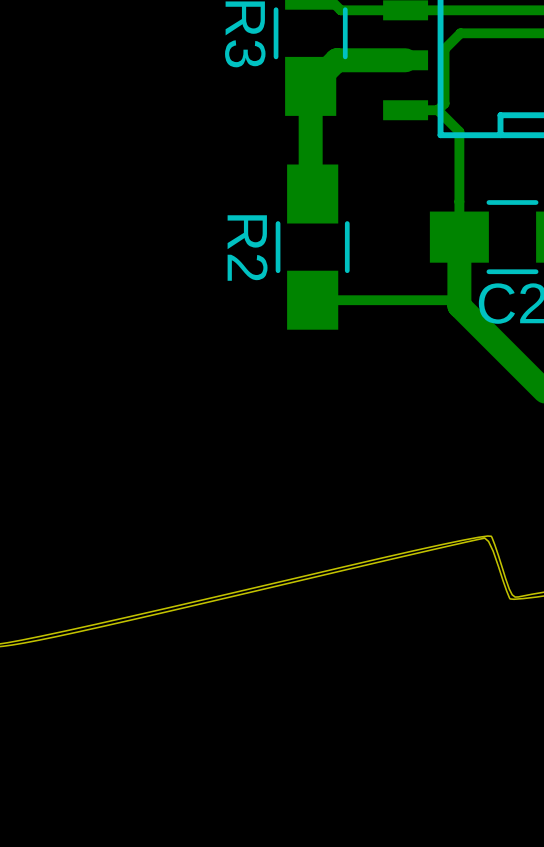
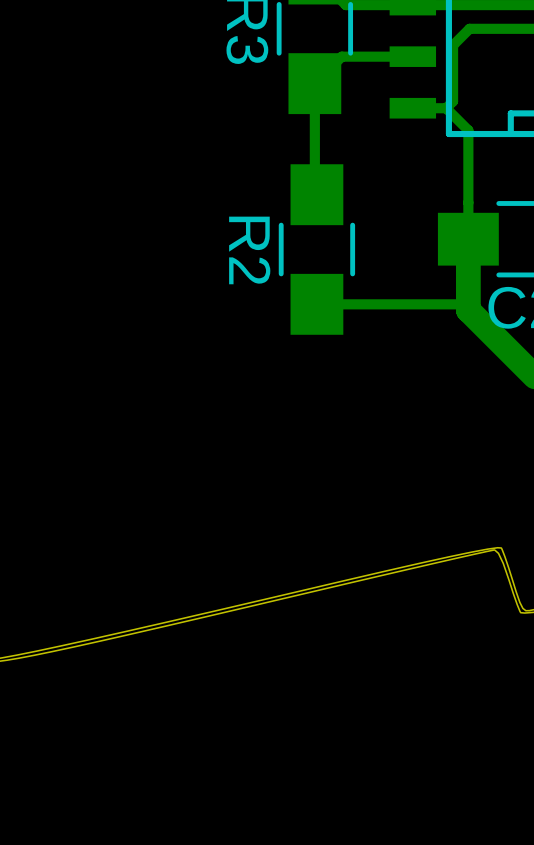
track width: thick (405, 60) (336, 60) (310, 86) (310, 192) (312, 194) -> thin (412, 56) (341, 56) (314, 83) (314, 192) (316, 194)

